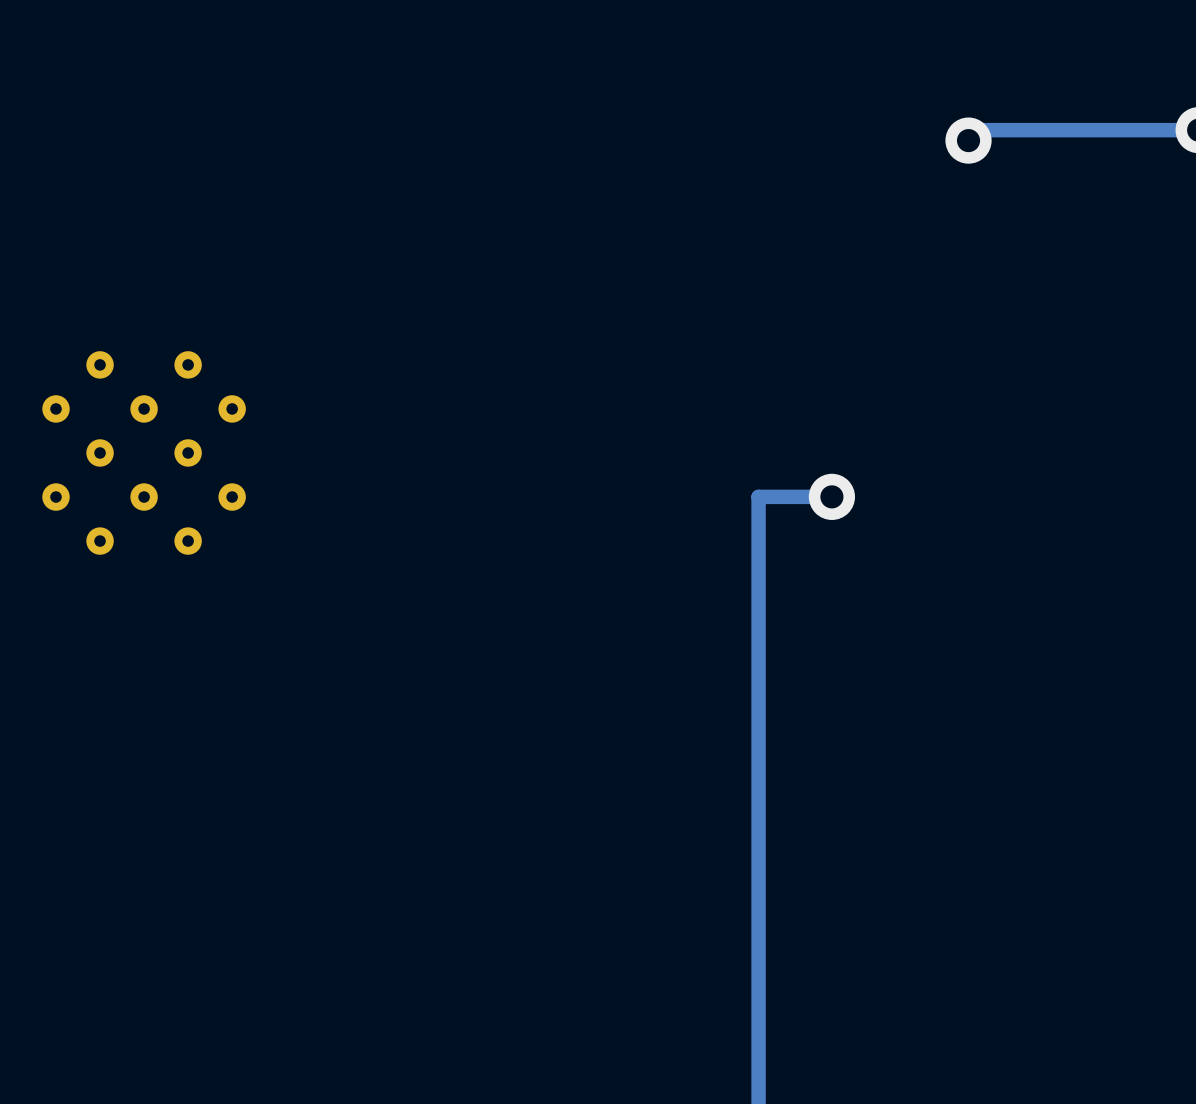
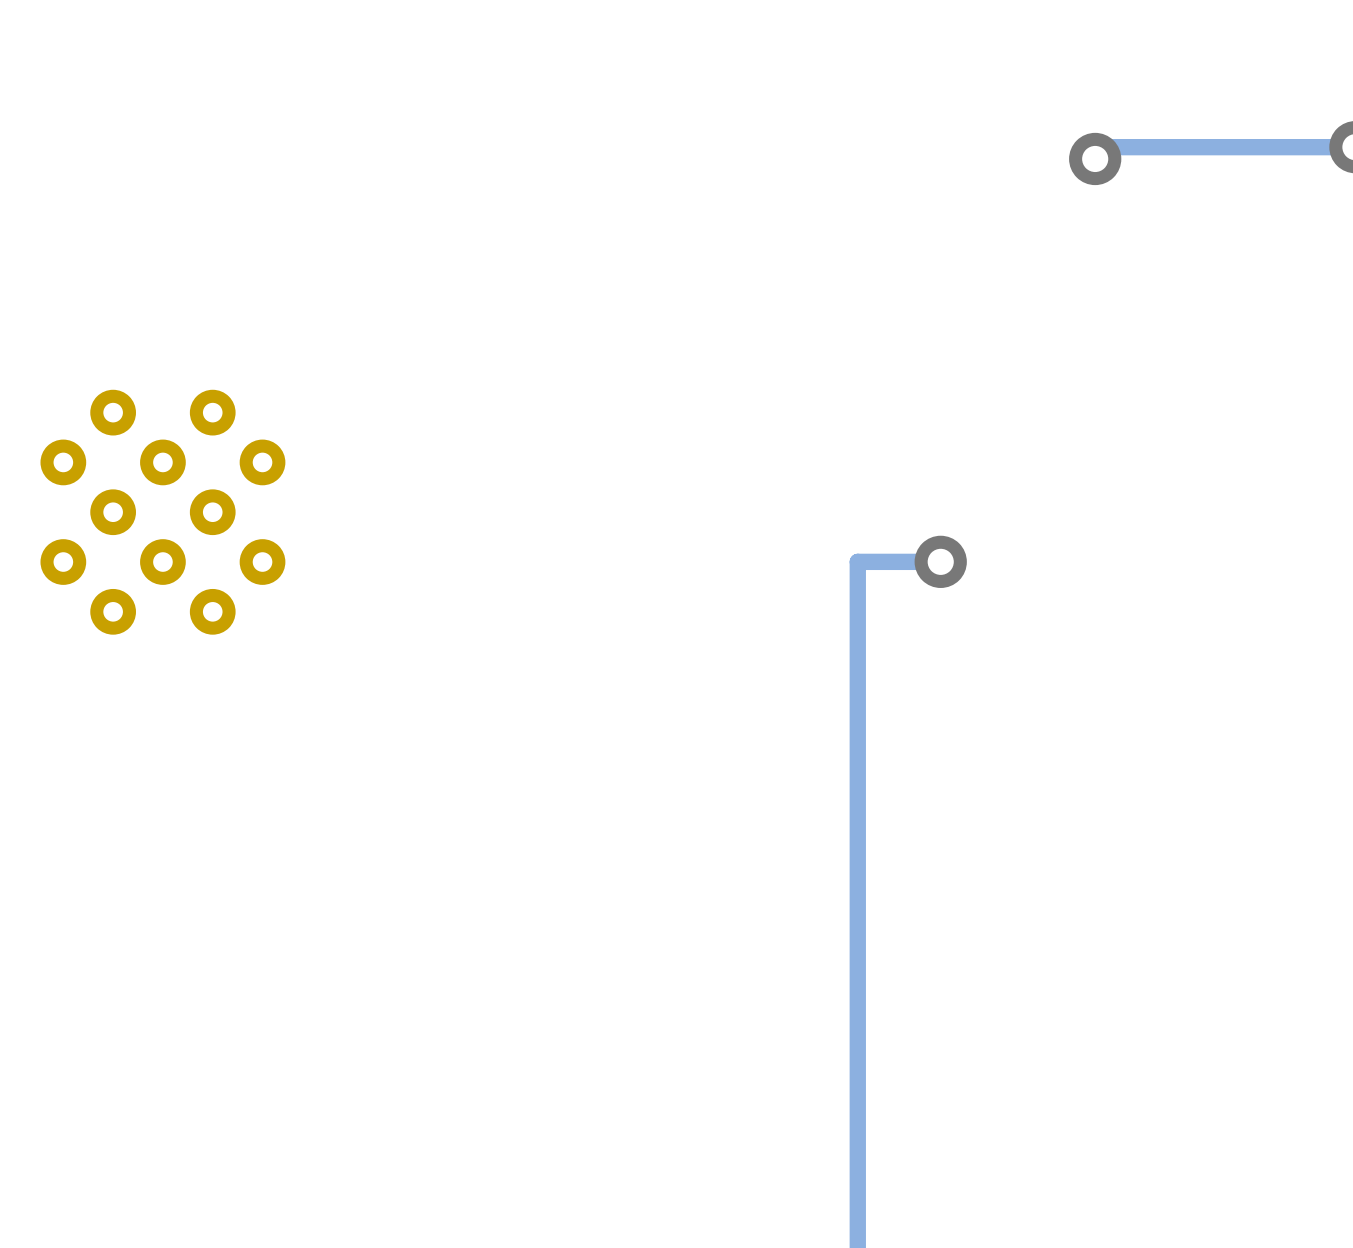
part footprint: [42, 351, 246, 555] -> [40, 389, 286, 635]

